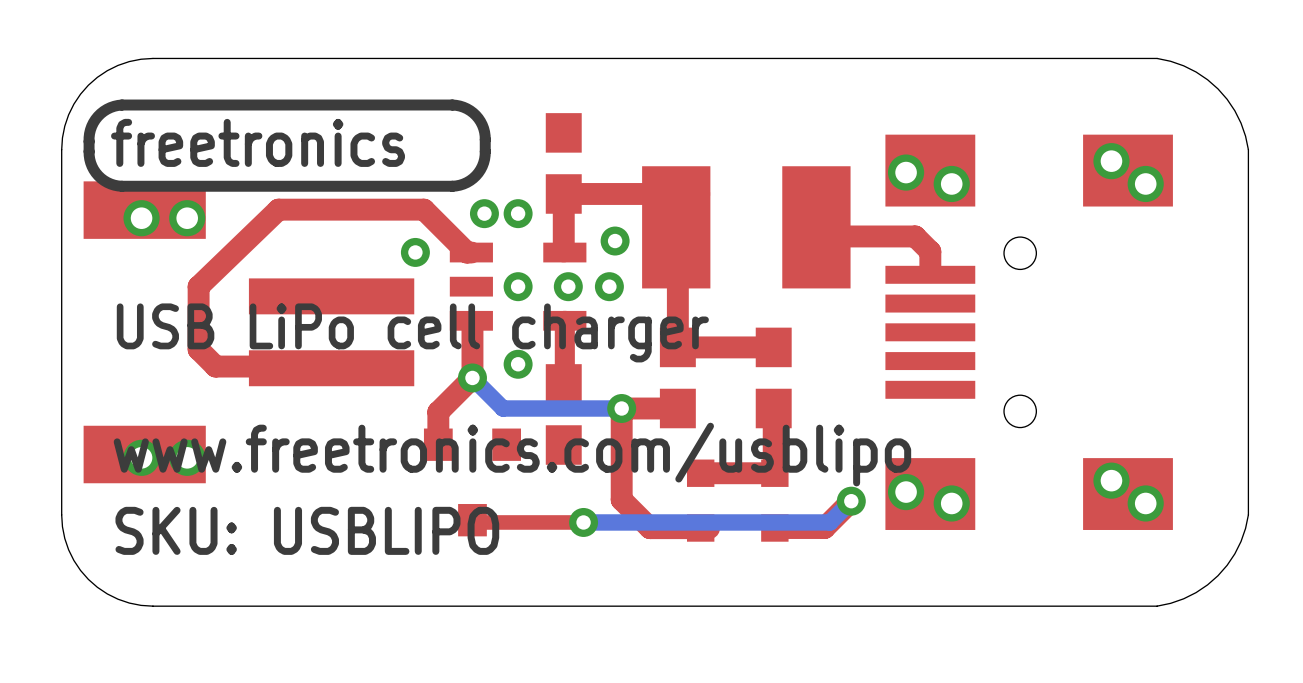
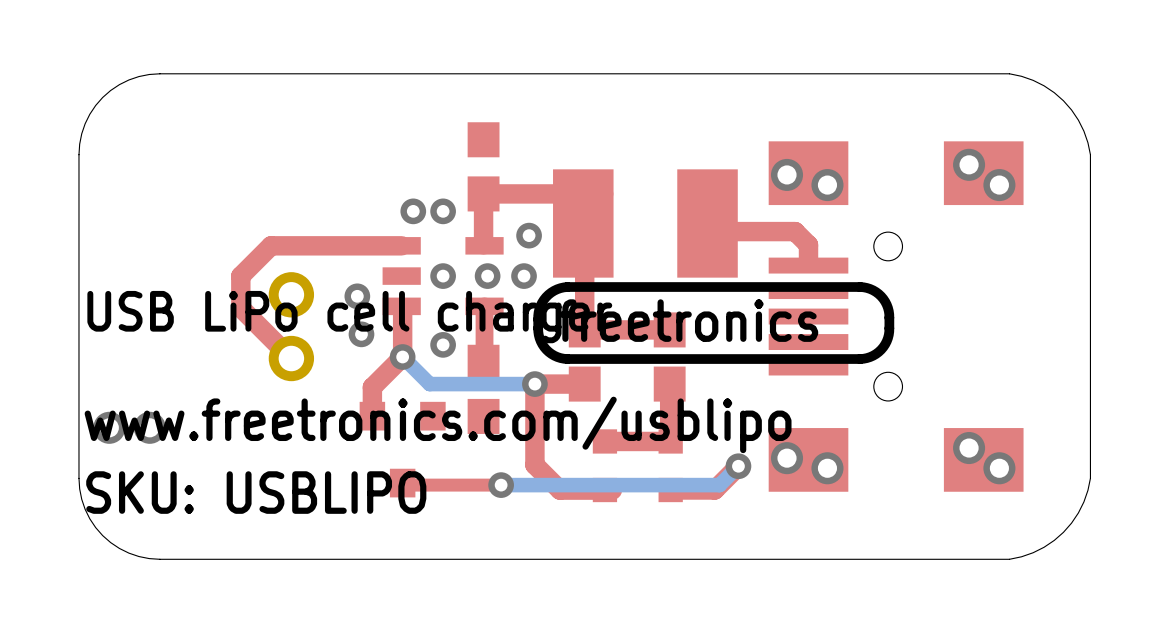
board edge: (198, 58) (141, 59) (129, 61) (107, 70) (88, 85) (73, 104) (64, 126) (61, 149) (61, 514) (64, 538) (68, 549) (80, 570) (88, 579) (107, 593) (129, 603) (141, 605) (198, 606) -> (159, 73) (128, 79) (102, 97) (85, 123) (78, 154) (78, 478) (81, 499) (95, 527) (110, 542) (138, 556) (159, 559)
line: (452, 105) (118, 105) (103, 111) (93, 122) (89, 137) (89, 159) (93, 169) (101, 178) (110, 184) (121, 186) (456, 185) (470, 180) (480, 169) (485, 155) (485, 135) (482, 124) (473, 112) (463, 107) (452, 105) -> (860, 287) (563, 287) (551, 292) (542, 302) (538, 315) (538, 334) (542, 344) (548, 351) (557, 357) (567, 359) (863, 358) (876, 354) (885, 344) (889, 331) (889, 314) (886, 304) (878, 294) (870, 288) (860, 287)
text position: freetronics (258, 142) -> freetronics (687, 320)
via: (141, 218) -> none
via: (187, 218) -> none
via: (415, 252) -> none
top track: (466, 252) (423, 209) (278, 209) (198, 286) (198, 349) (215, 366) (329, 366) (331, 368) -> (397, 245) (271, 245) (240, 276) (240, 307) (291, 358)
via: none -> (357, 296)
part: (248, 332) -> none
part: none -> (291, 326)
via: none -> (361, 334)

